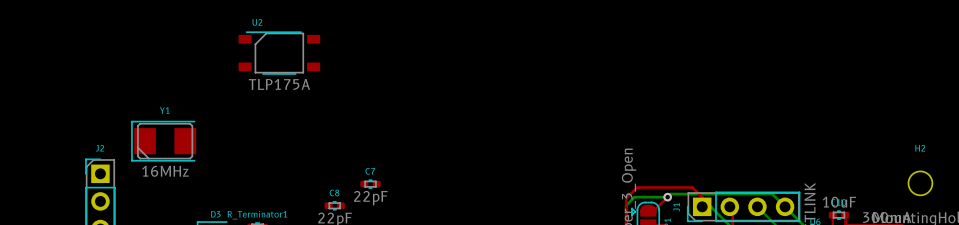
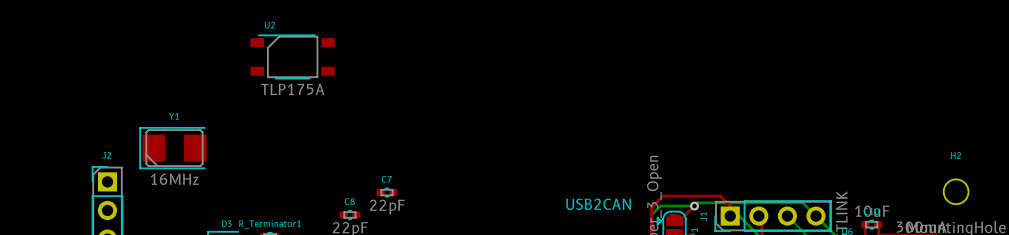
text: none -> USB2CAN (598, 204)

